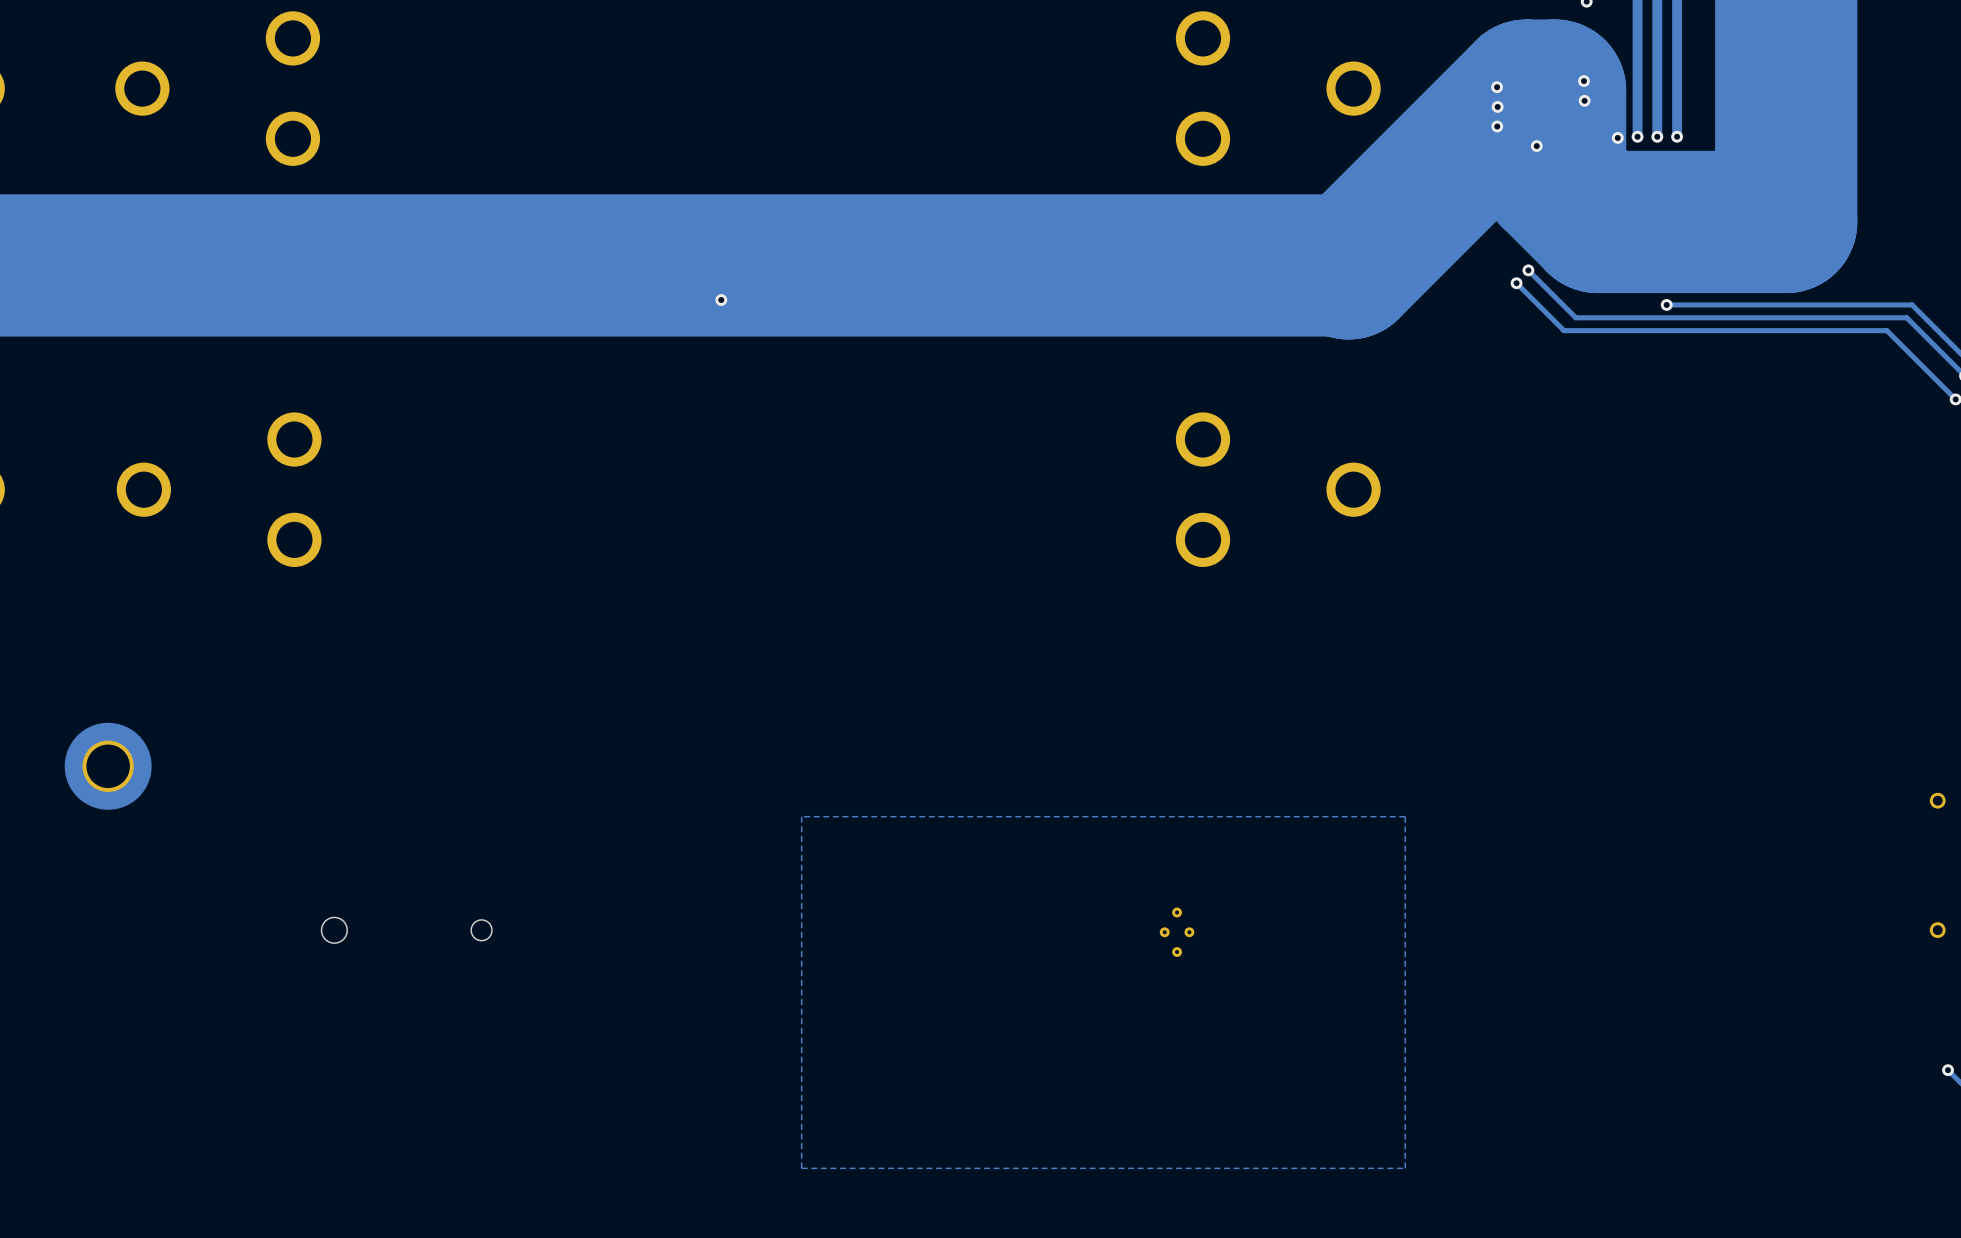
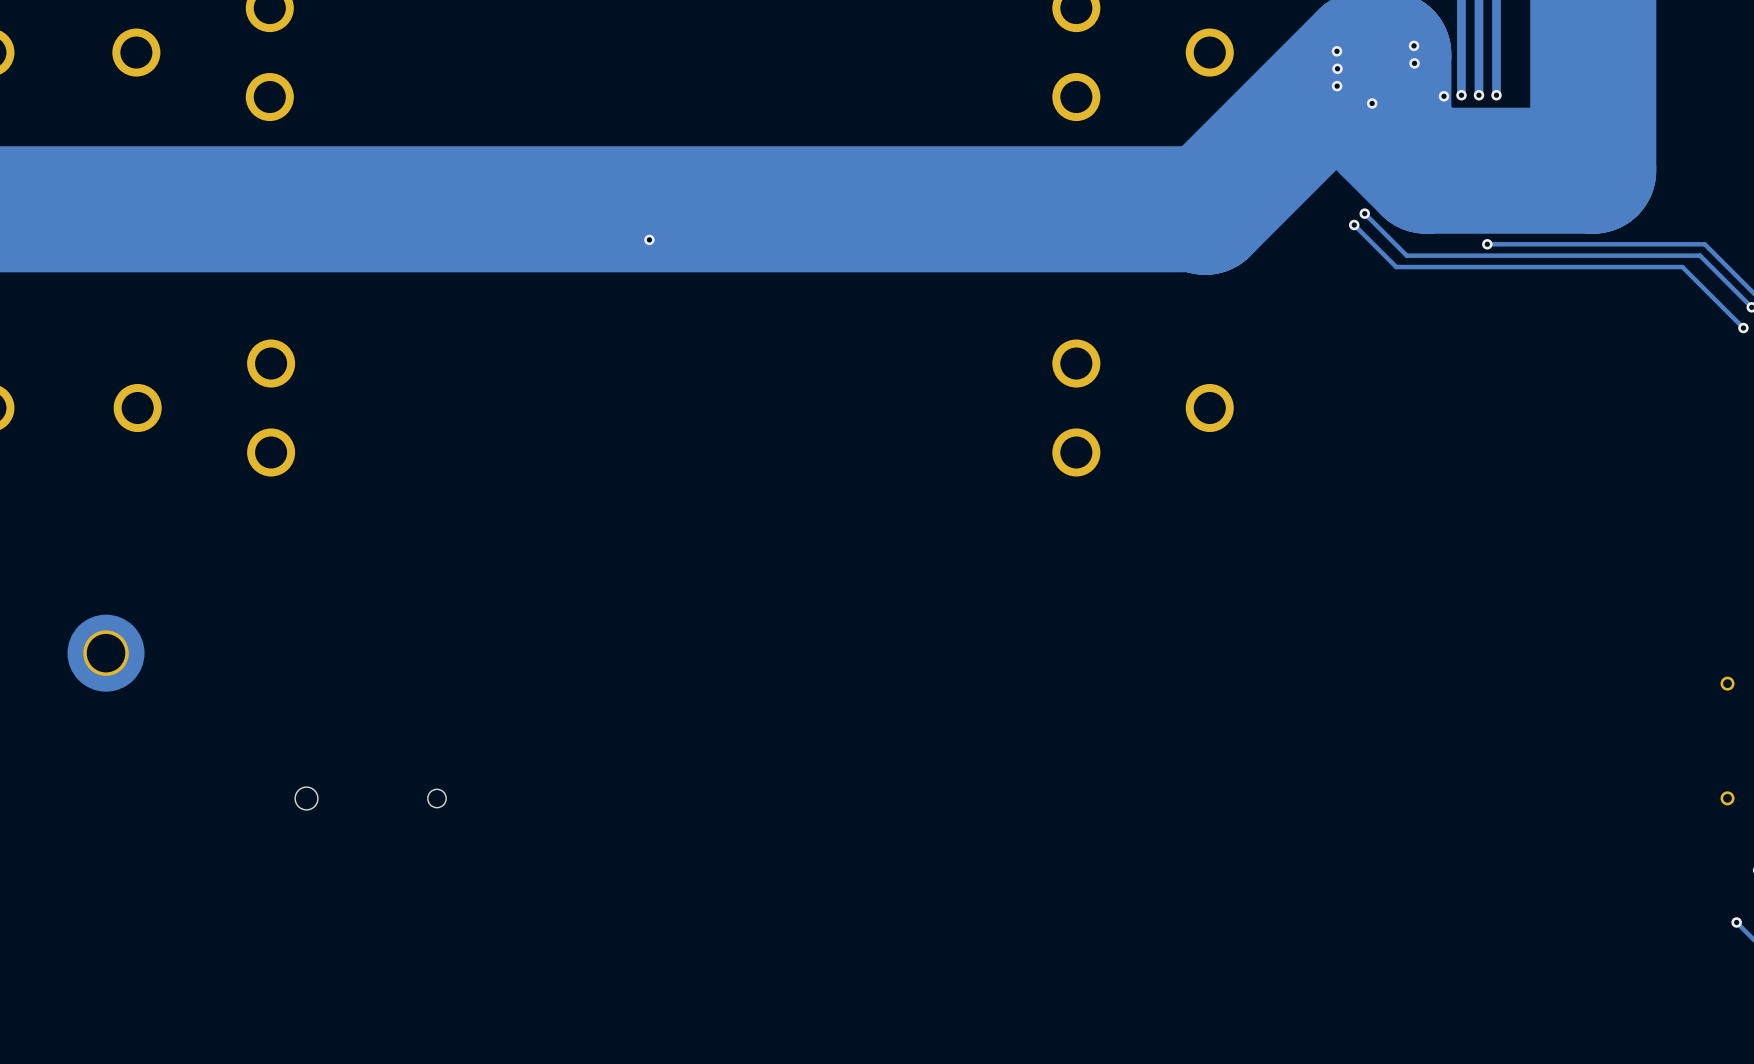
zone outline: (1405, 816) (1405, 1168) (801, 1168) (801, 816) (1405, 816) -> none
part: (1177, 932) -> none

